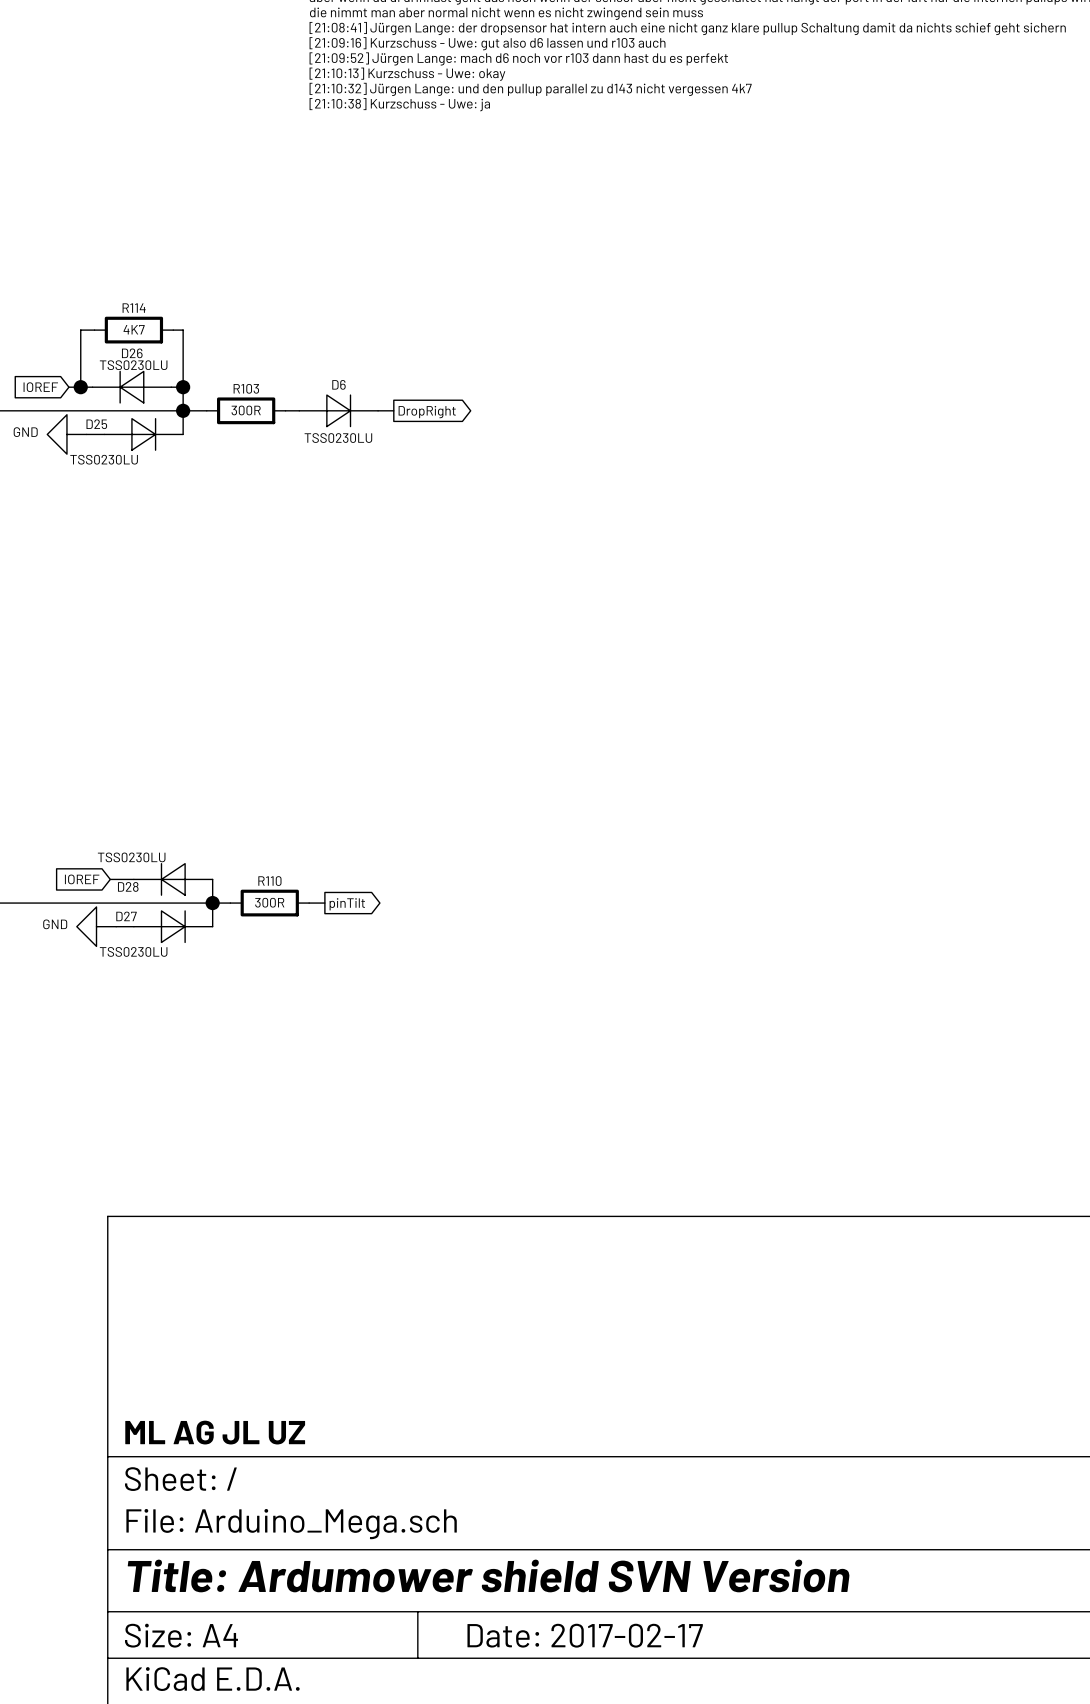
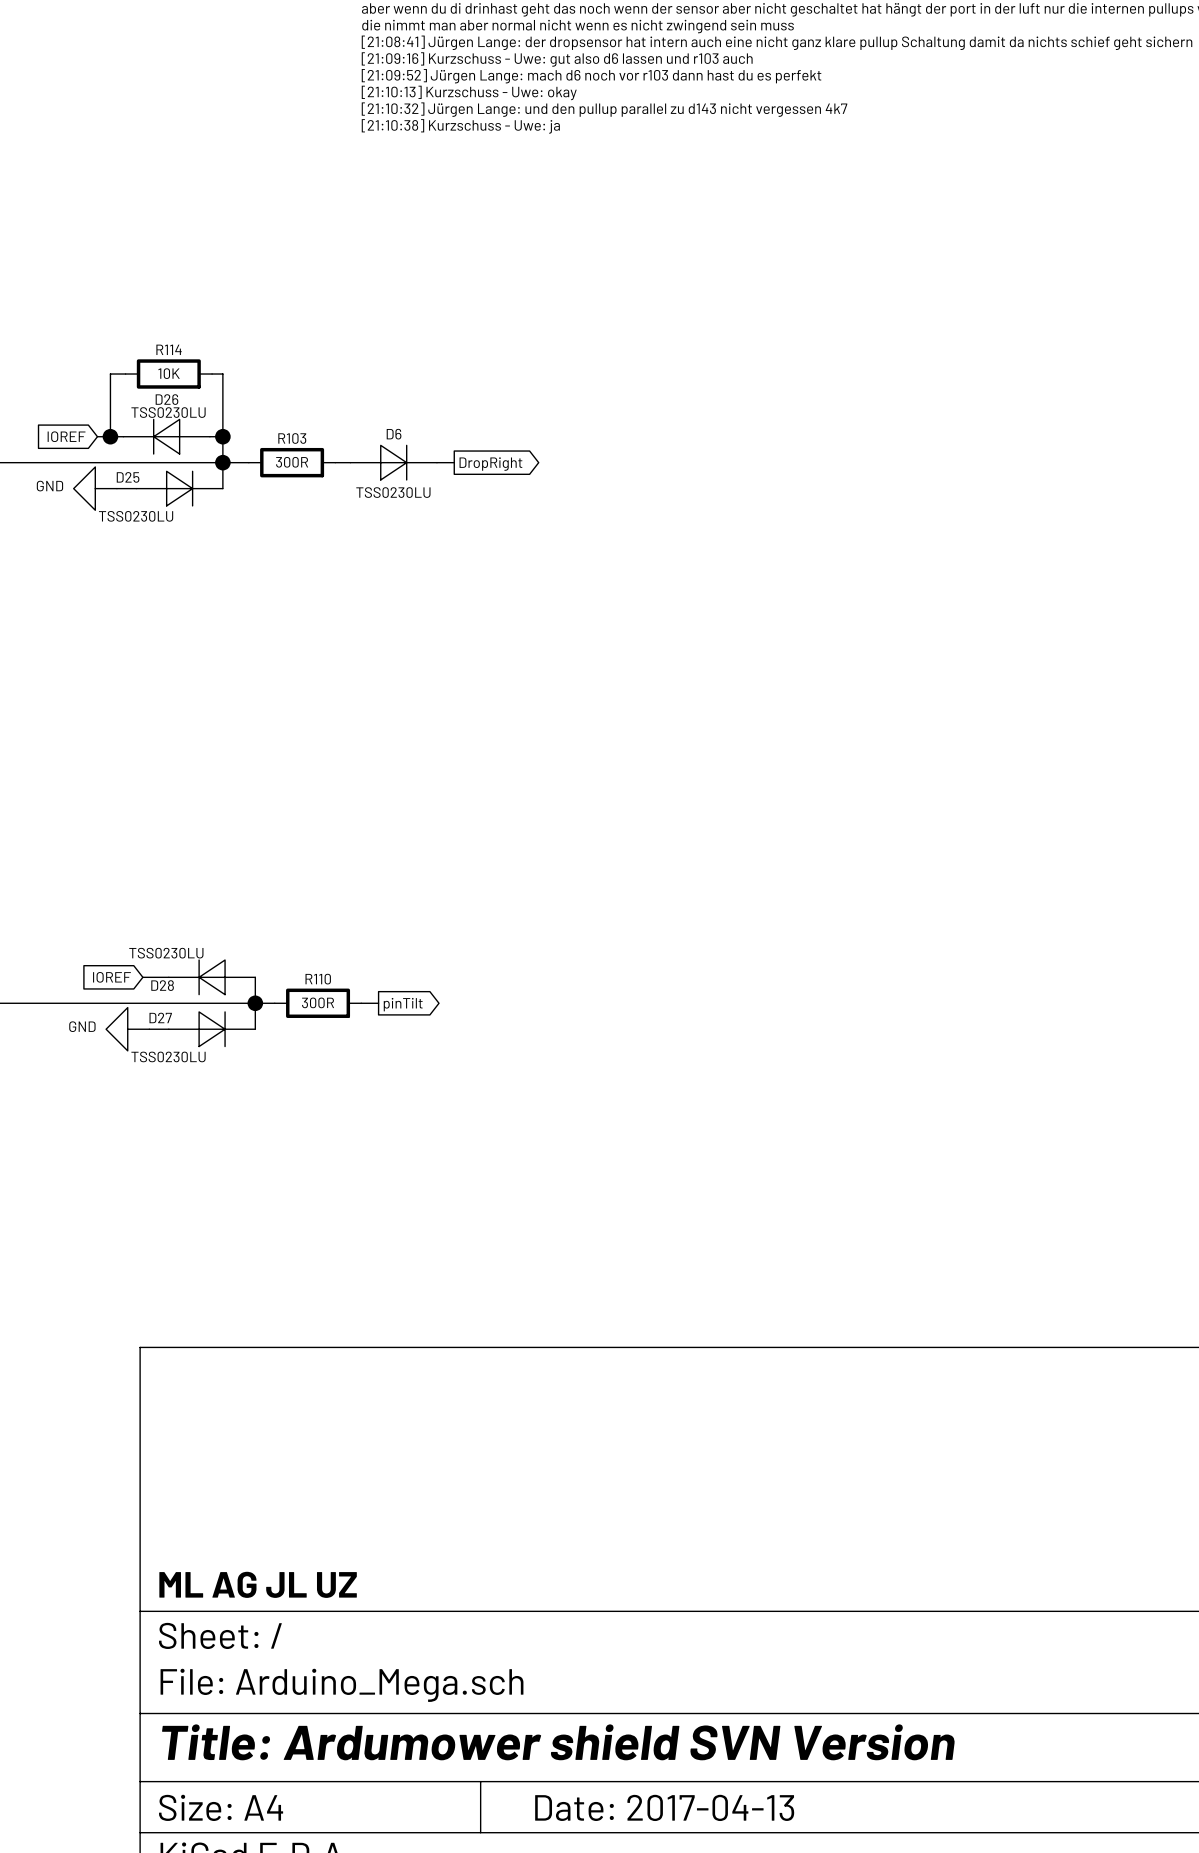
R114 value: 4K7 (134, 329) -> 10K (169, 373)
title block: Date: 2017-02-17 (585, 1635) -> Date: 2017-04-13 (664, 1807)

